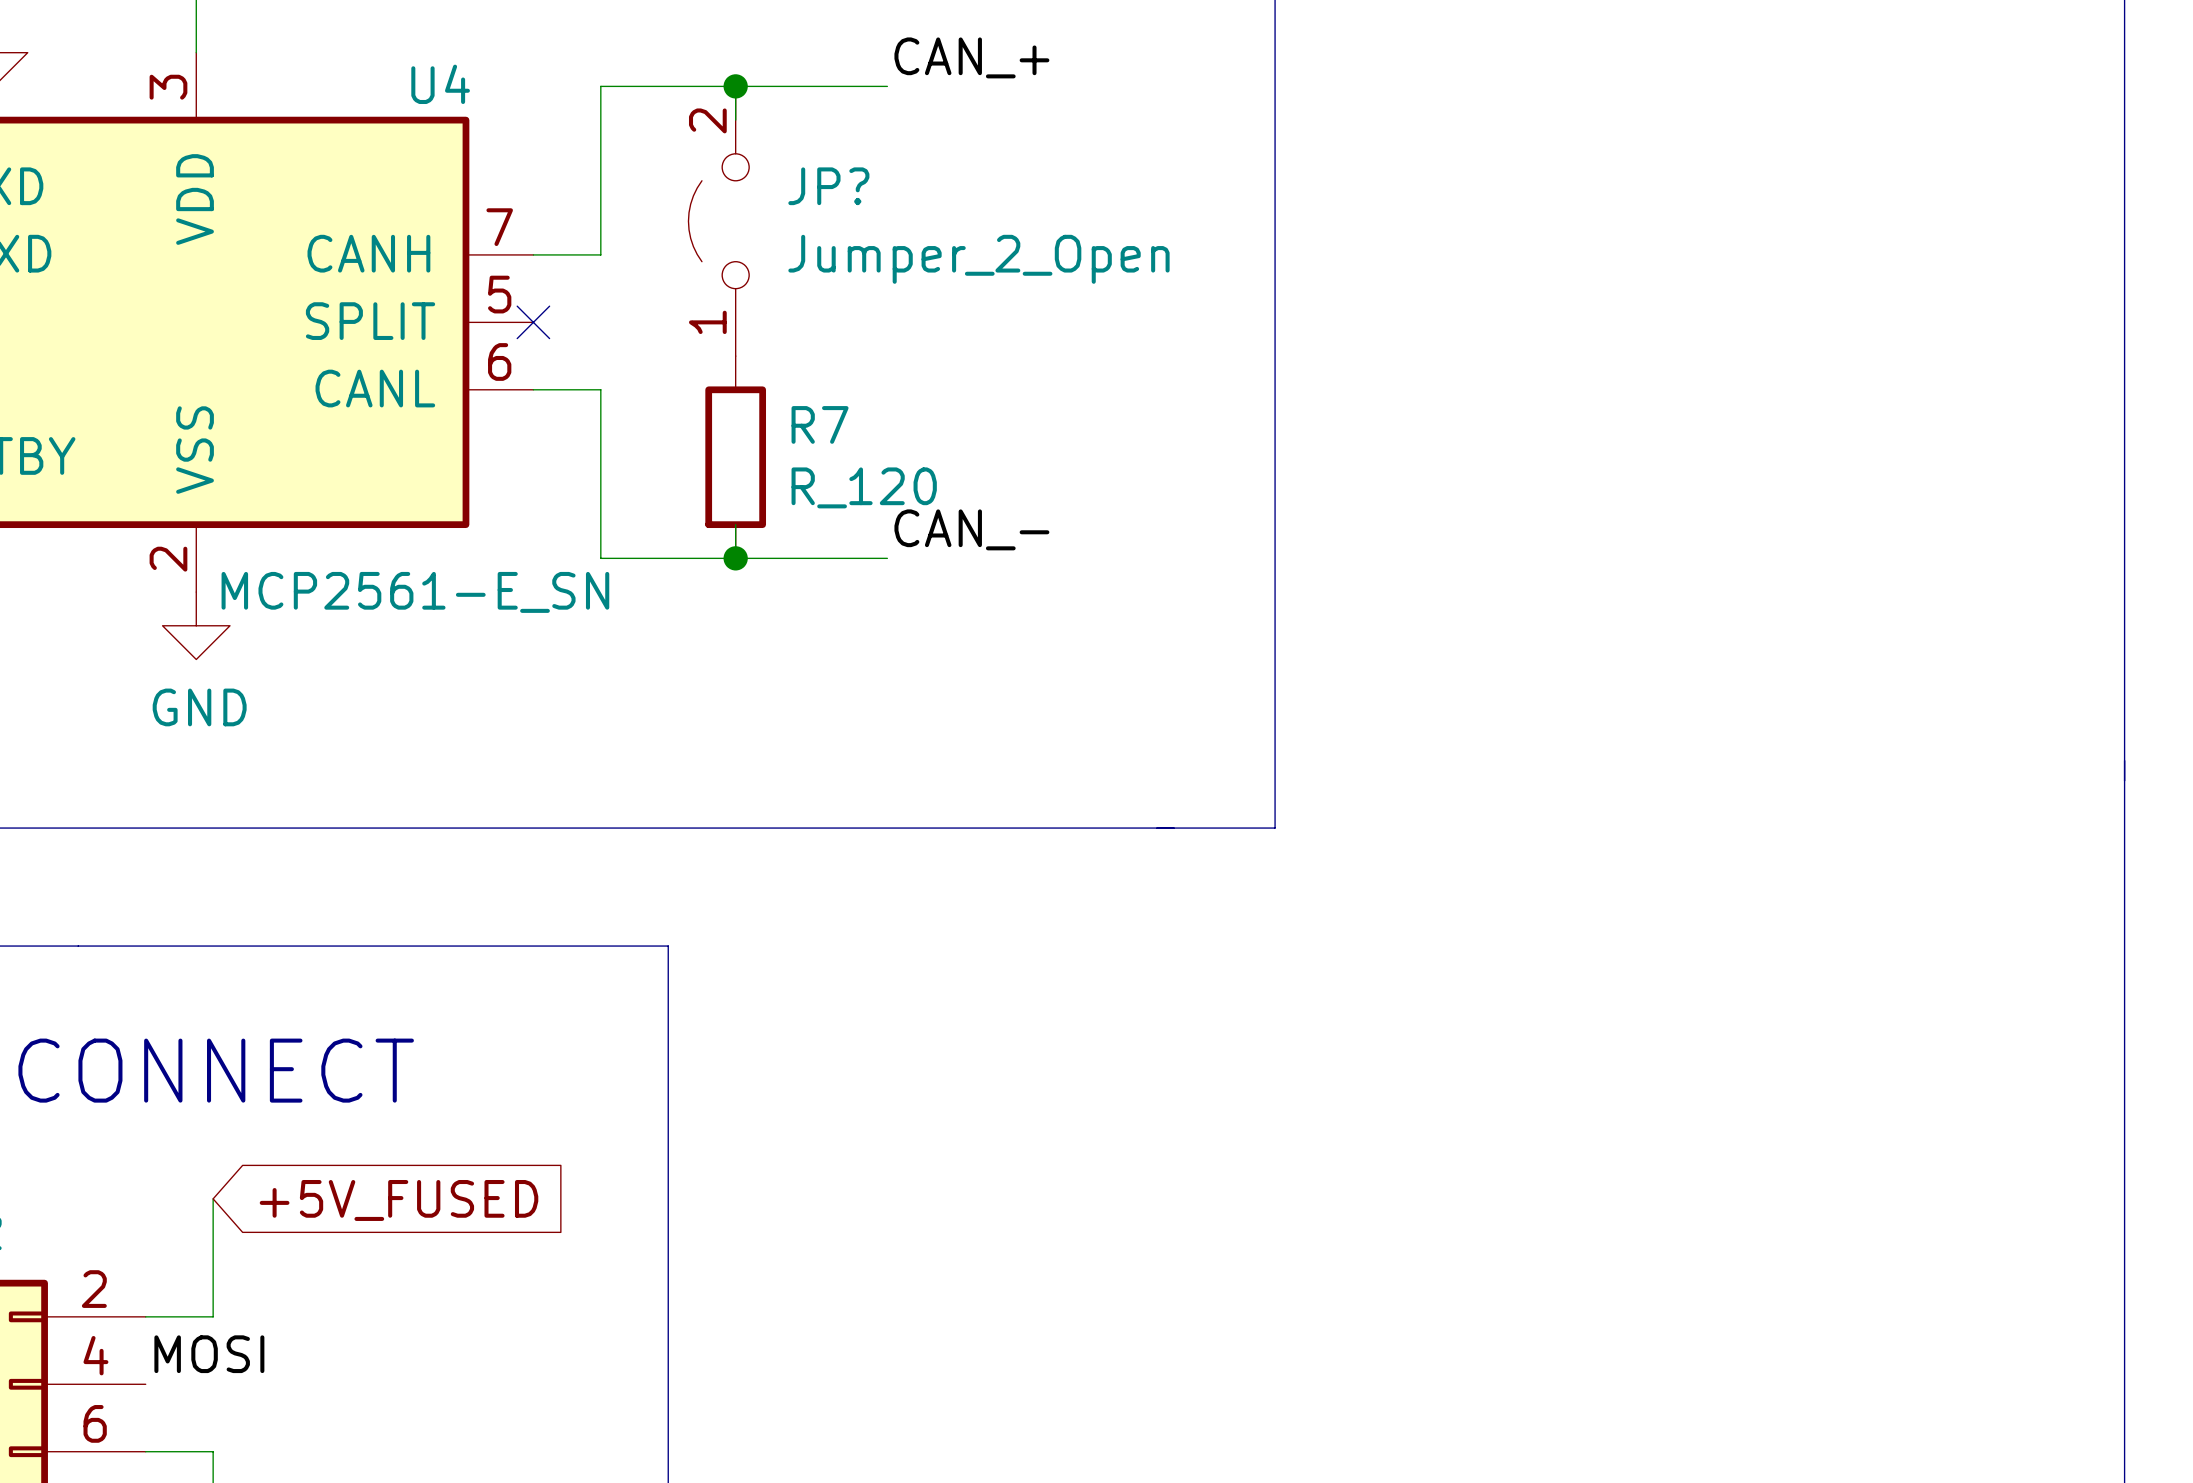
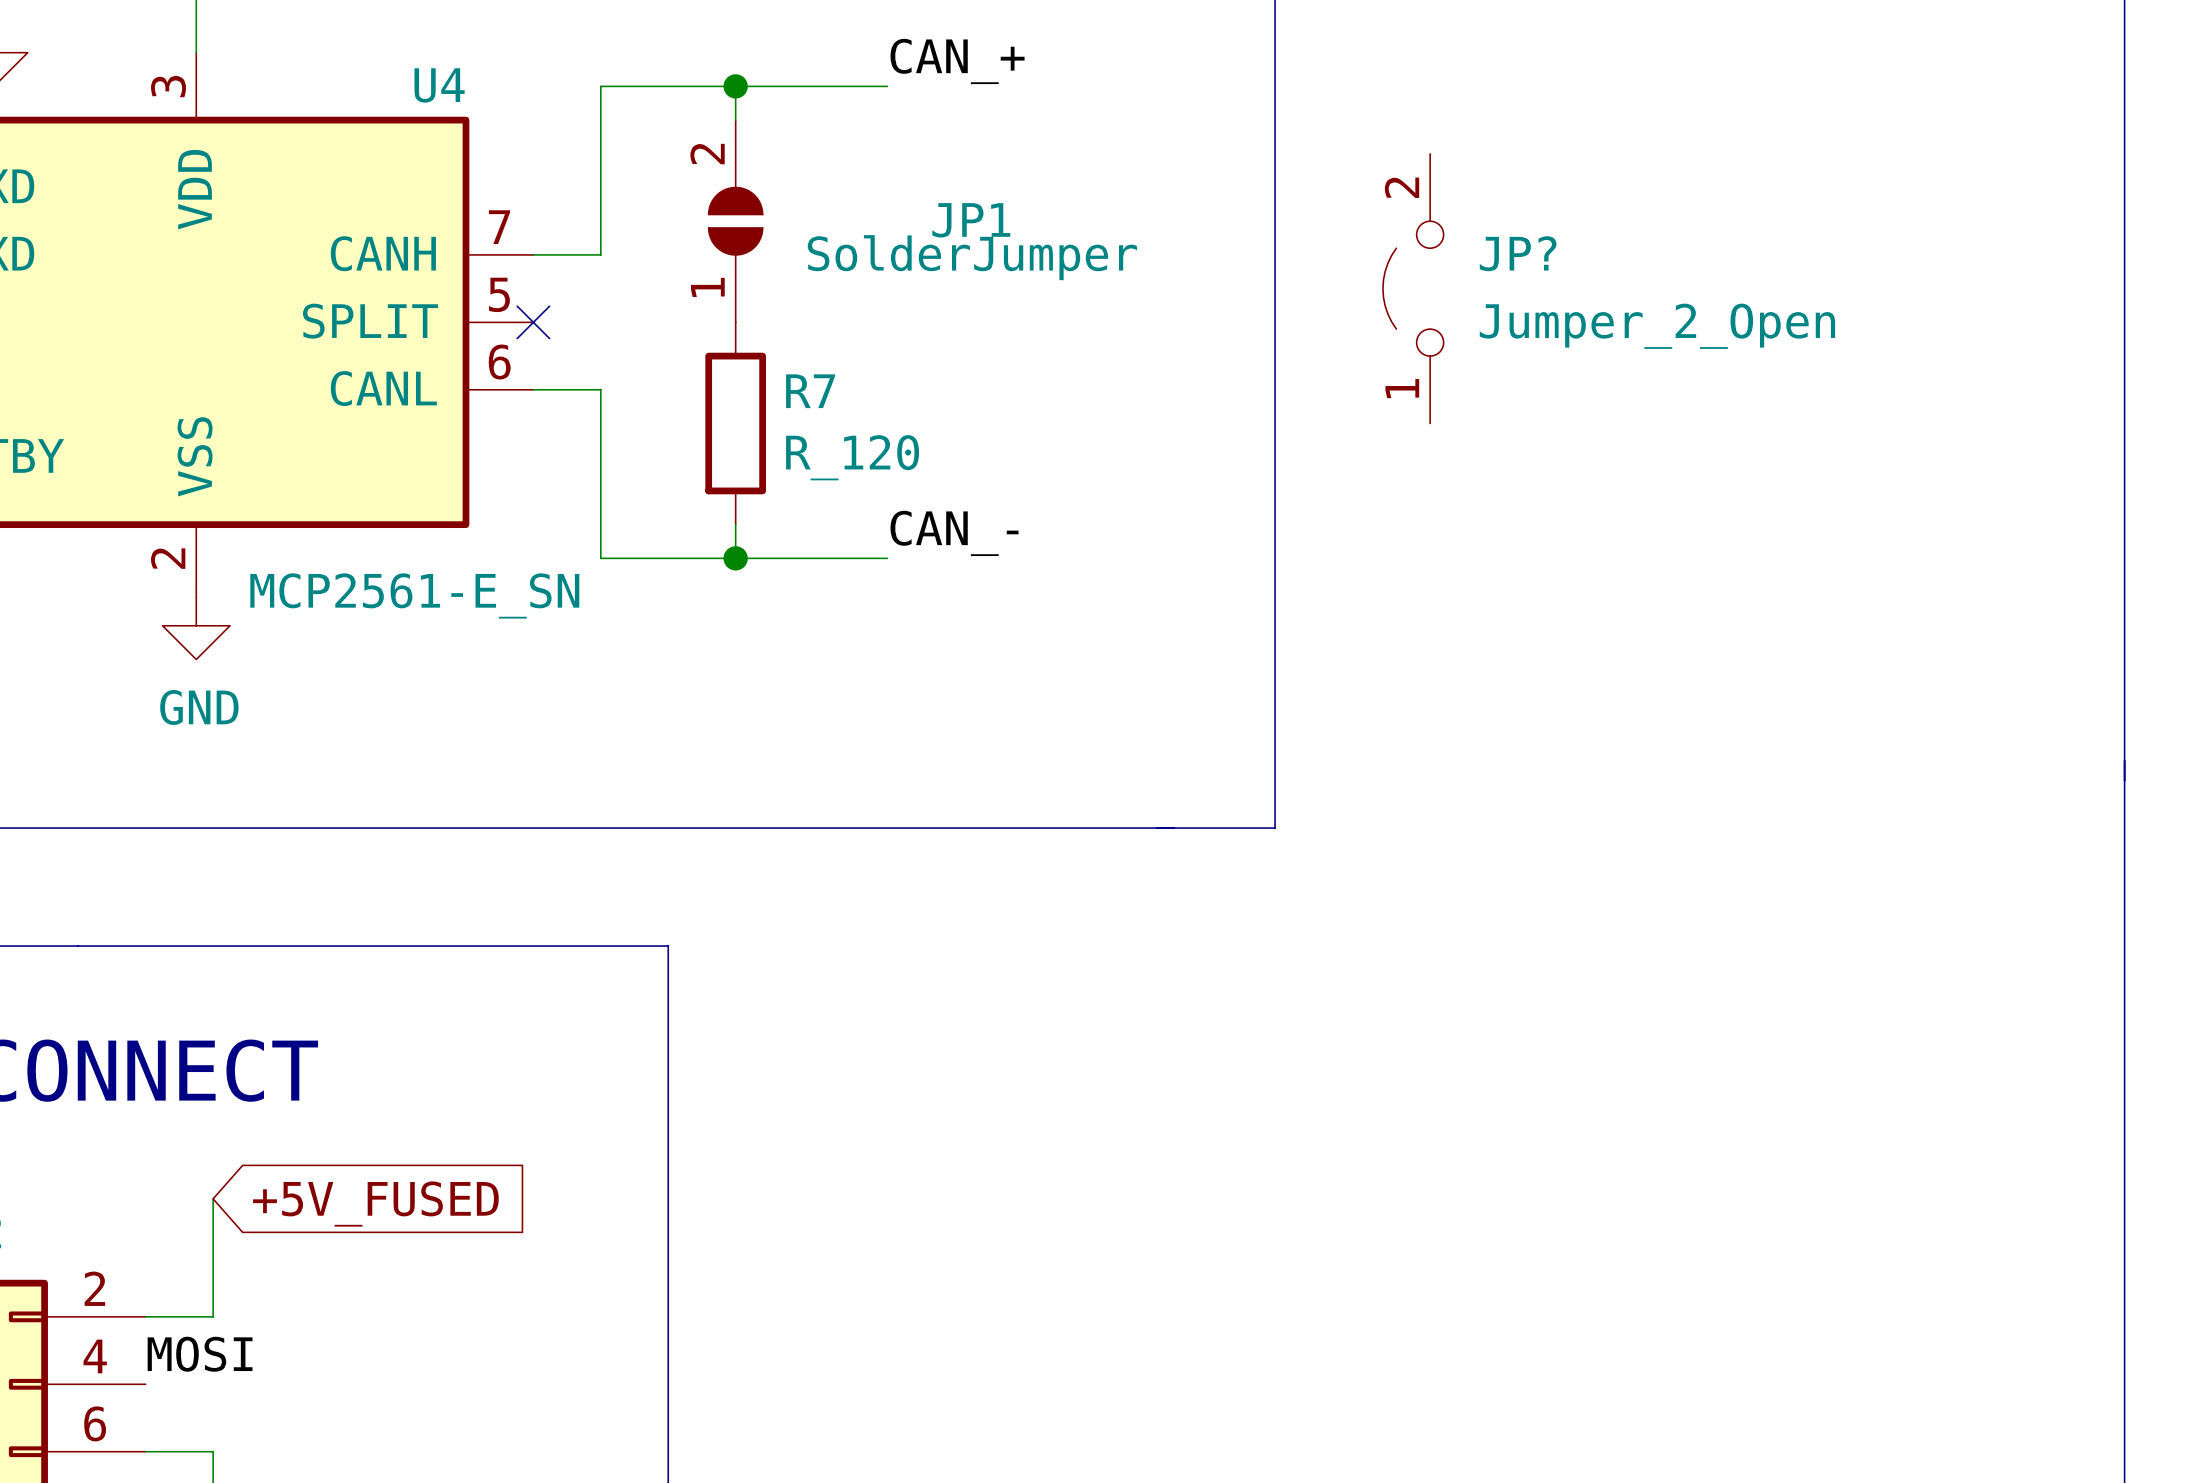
JP?: Jumper_2_Open (718, 221) -> none
JP1: none -> SolderJumper (735, 221)
JP?: none -> Jumper_2_Open (1413, 288)
R7 position: (735, 457) -> (735, 423)

